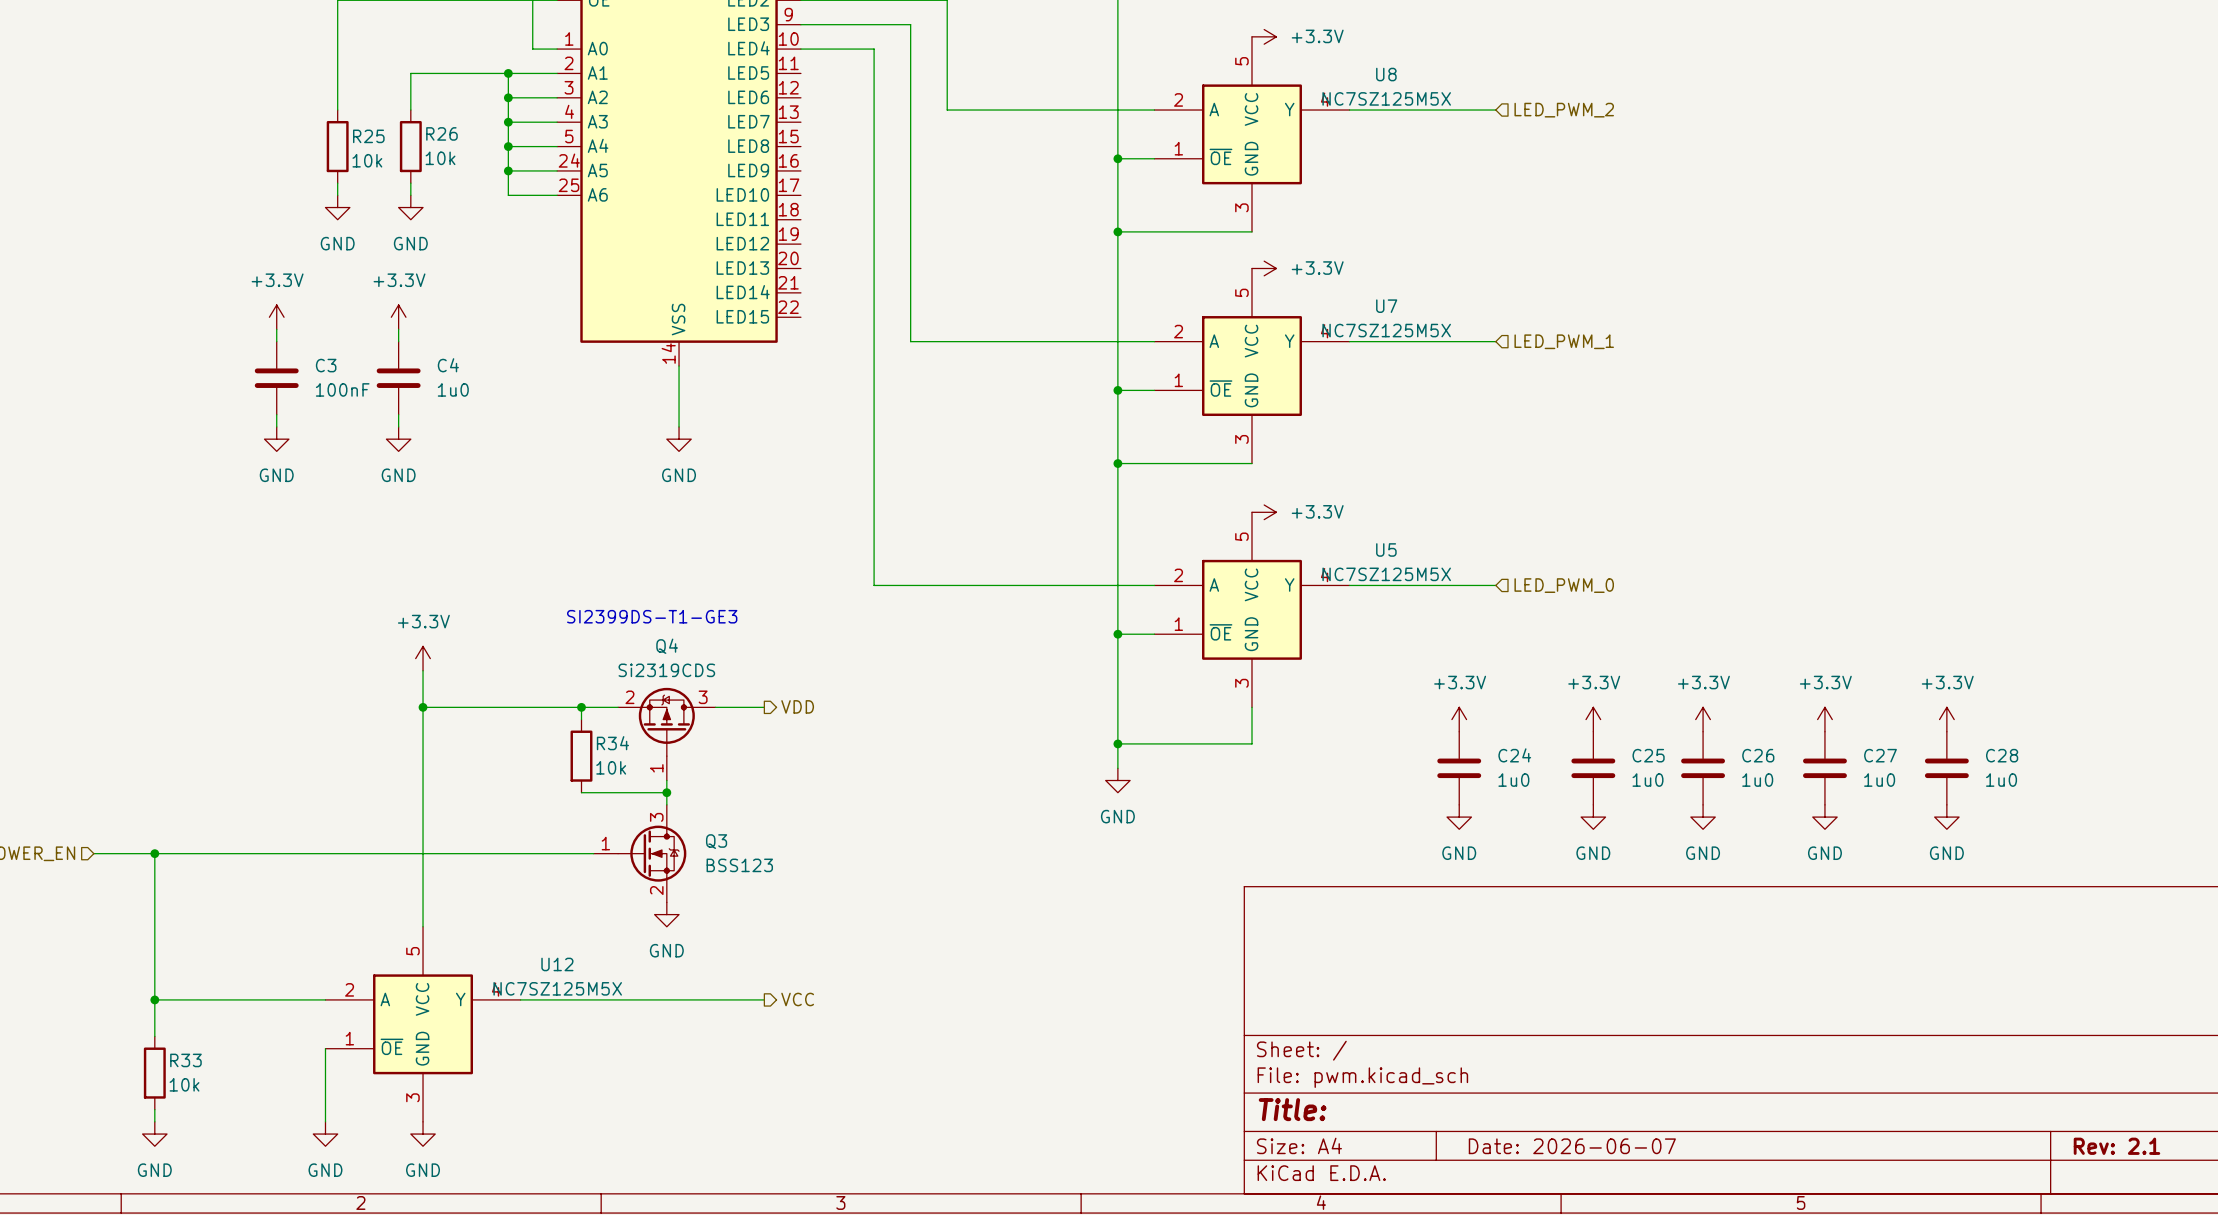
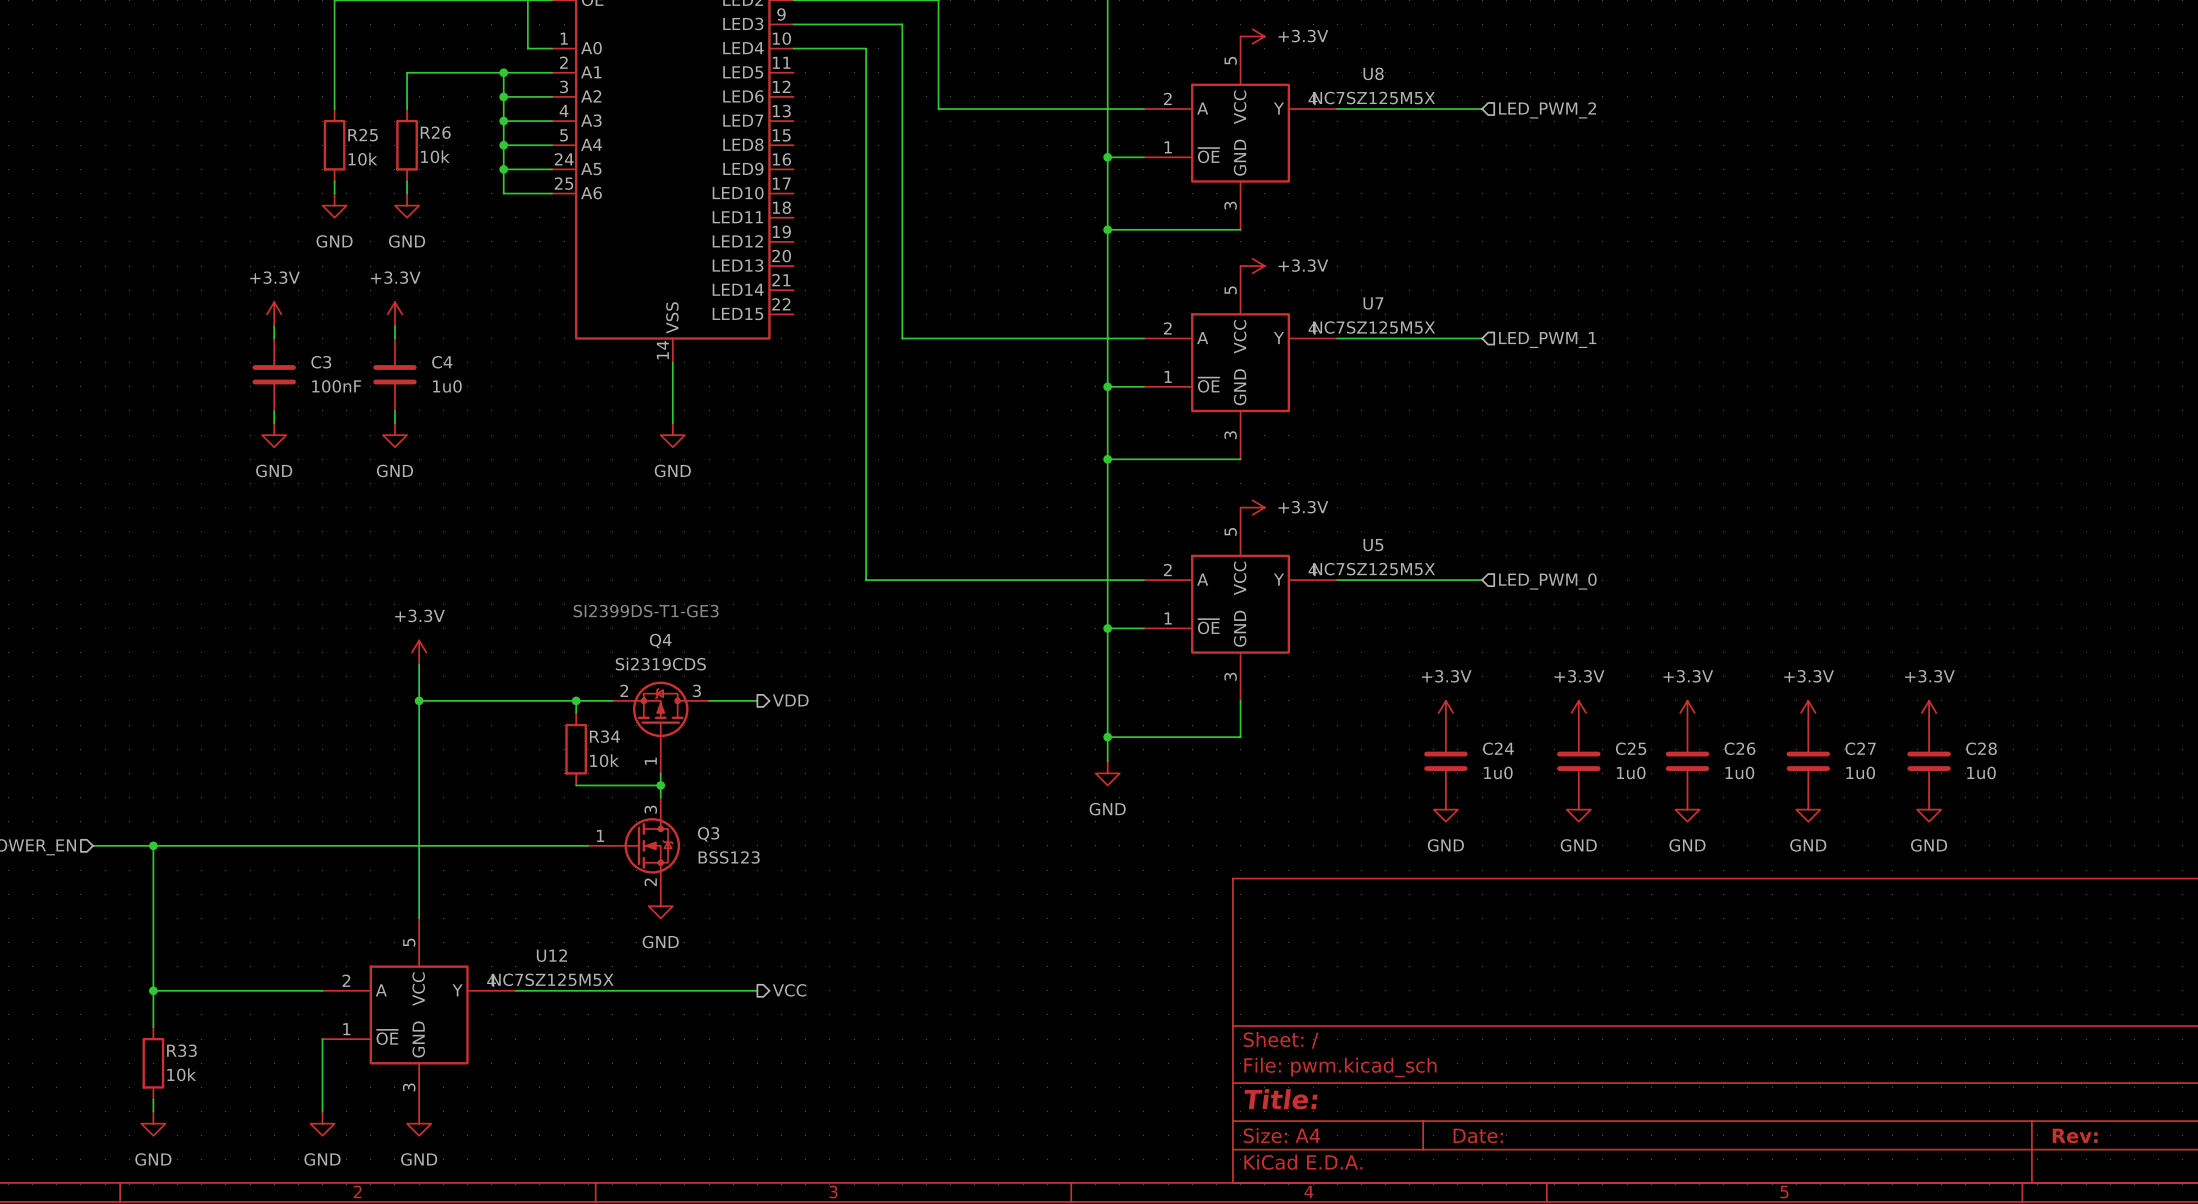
title block: Date: 2026-06-07 (1572, 1146) -> Date: (1478, 1135)
title block: Rev: 2.1 (2116, 1146) -> Rev: (2075, 1135)

